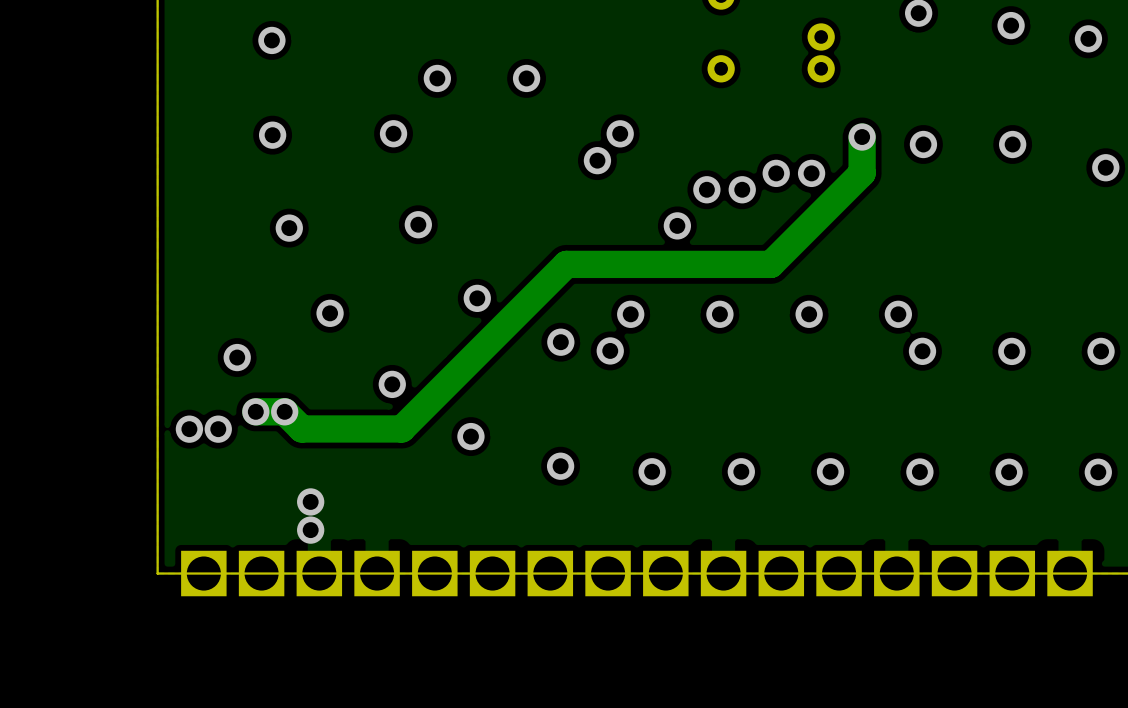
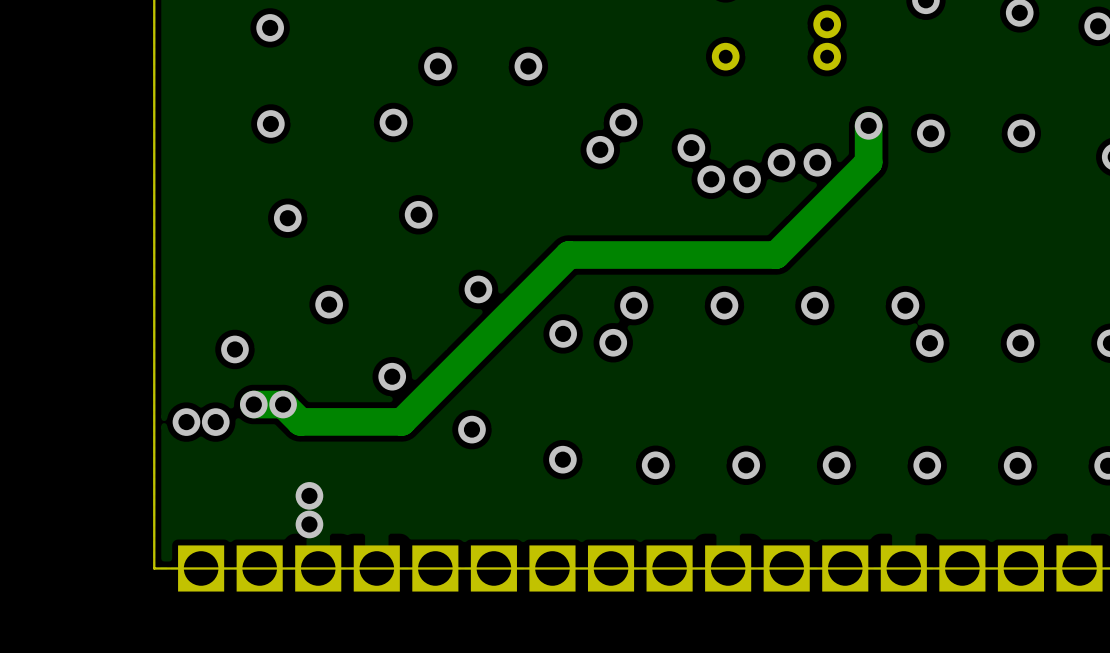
via position: (677, 225) -> (691, 148)

